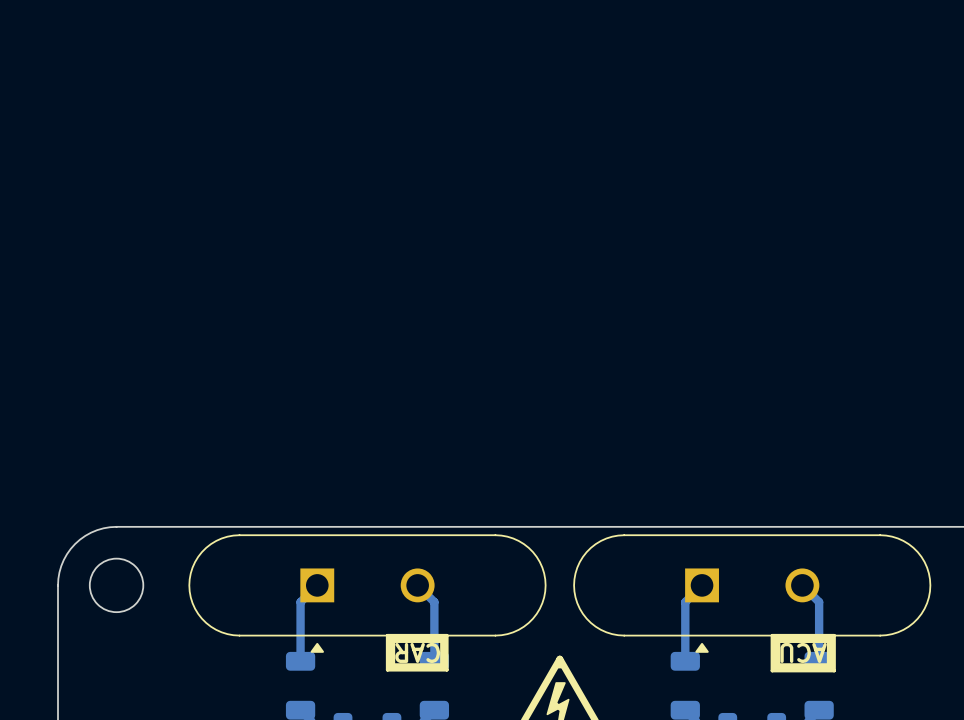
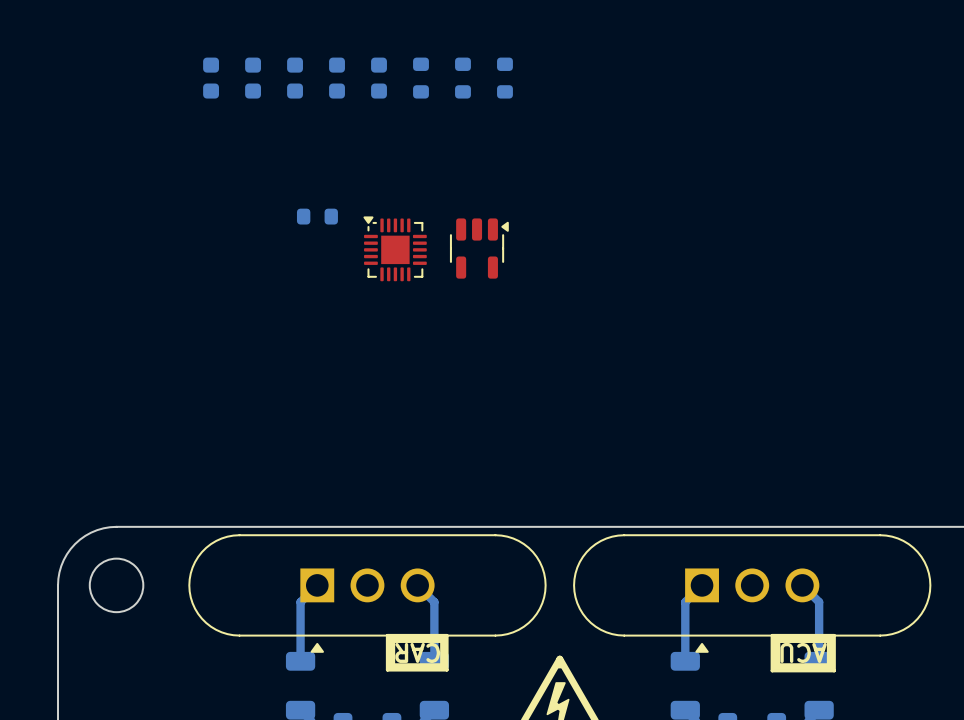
part: none -> (211, 78)
part: none -> (253, 78)
part: none -> (295, 78)
part: none -> (337, 78)
part: none -> (379, 78)
part: none -> (421, 78)
part: none -> (462, 78)
part: none -> (504, 78)
part: none -> (317, 216)
part: none -> (395, 248)
part: none -> (479, 248)
part footprint: [188, 534, 547, 653] -> [188, 534, 547, 653]
part footprint: [573, 534, 932, 653] -> [573, 534, 932, 653]

